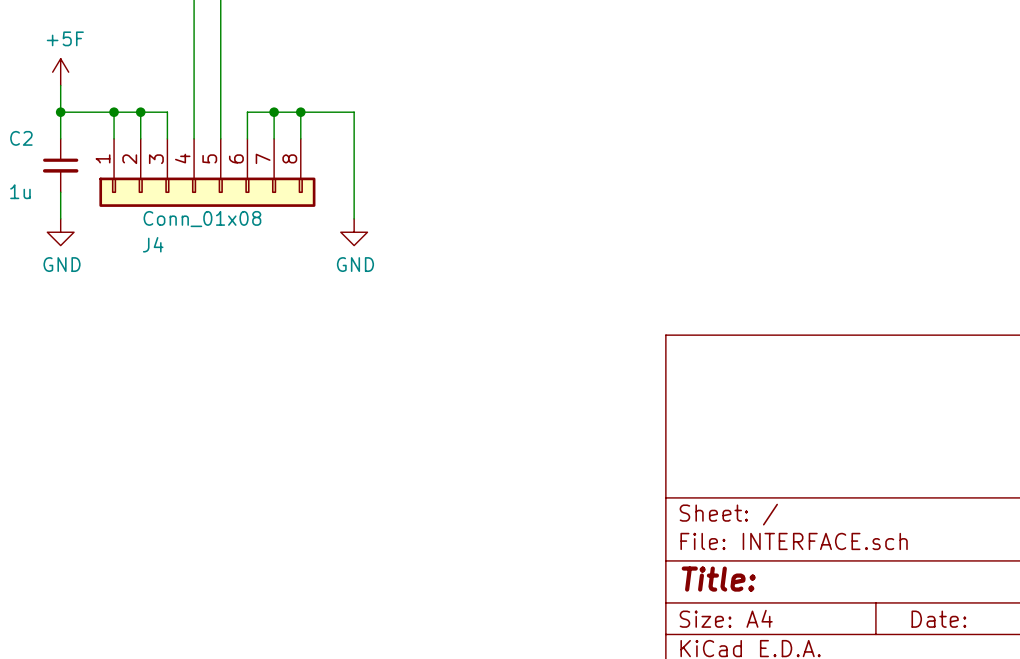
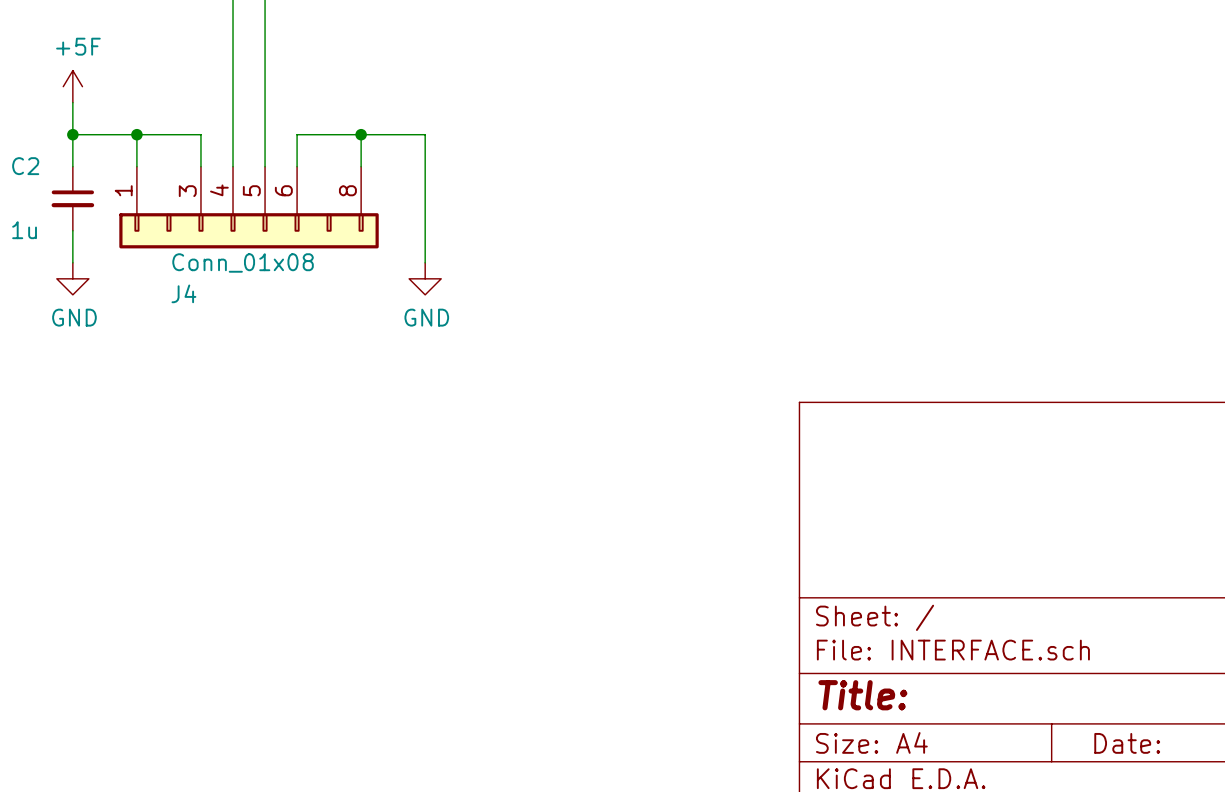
wire: (140, 112) (140, 138) -> none
junction: (140, 112) -> none
wire: (274, 112) (274, 138) -> none
junction: (274, 112) -> none
J4 symbol: [99, 138, 316, 207] -> [119, 166, 379, 249]

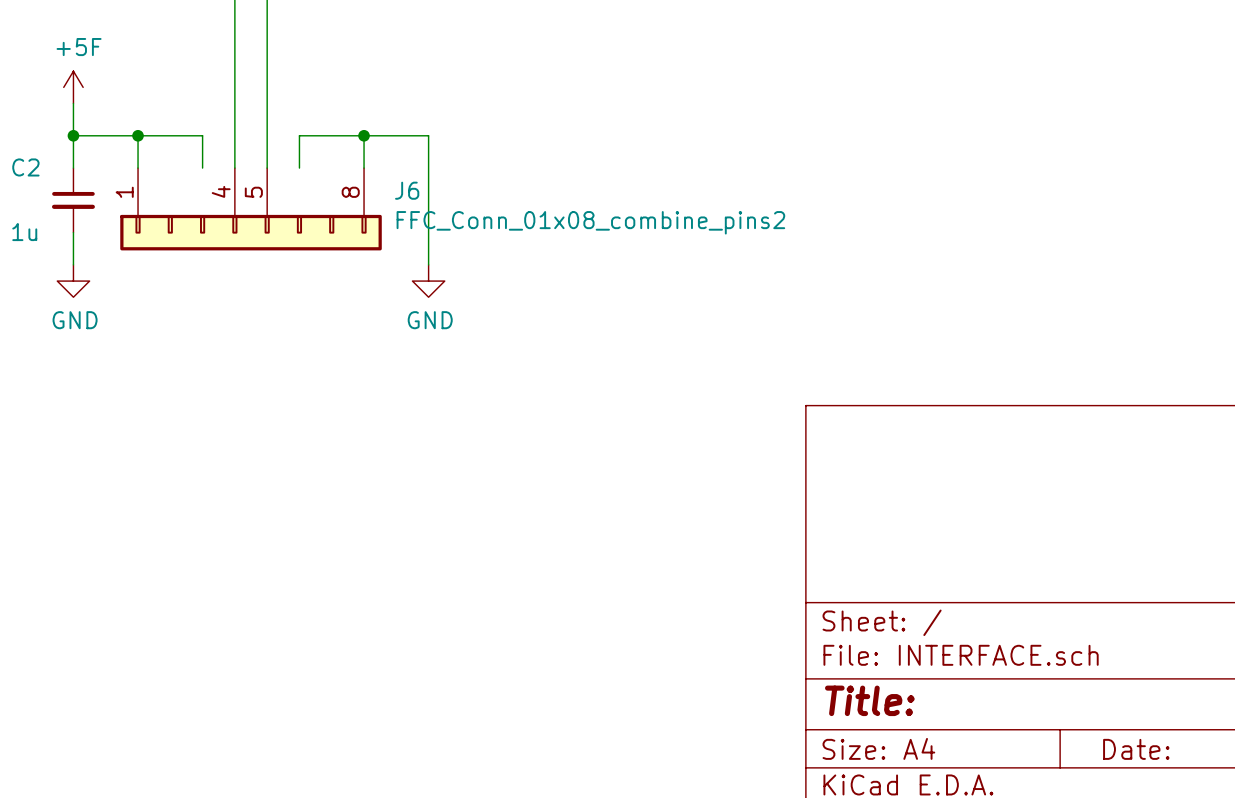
J4: Conn_01x08 (249, 207) -> none
J6: none -> FFC_Conn_01x08_combine_pins2 (251, 209)

